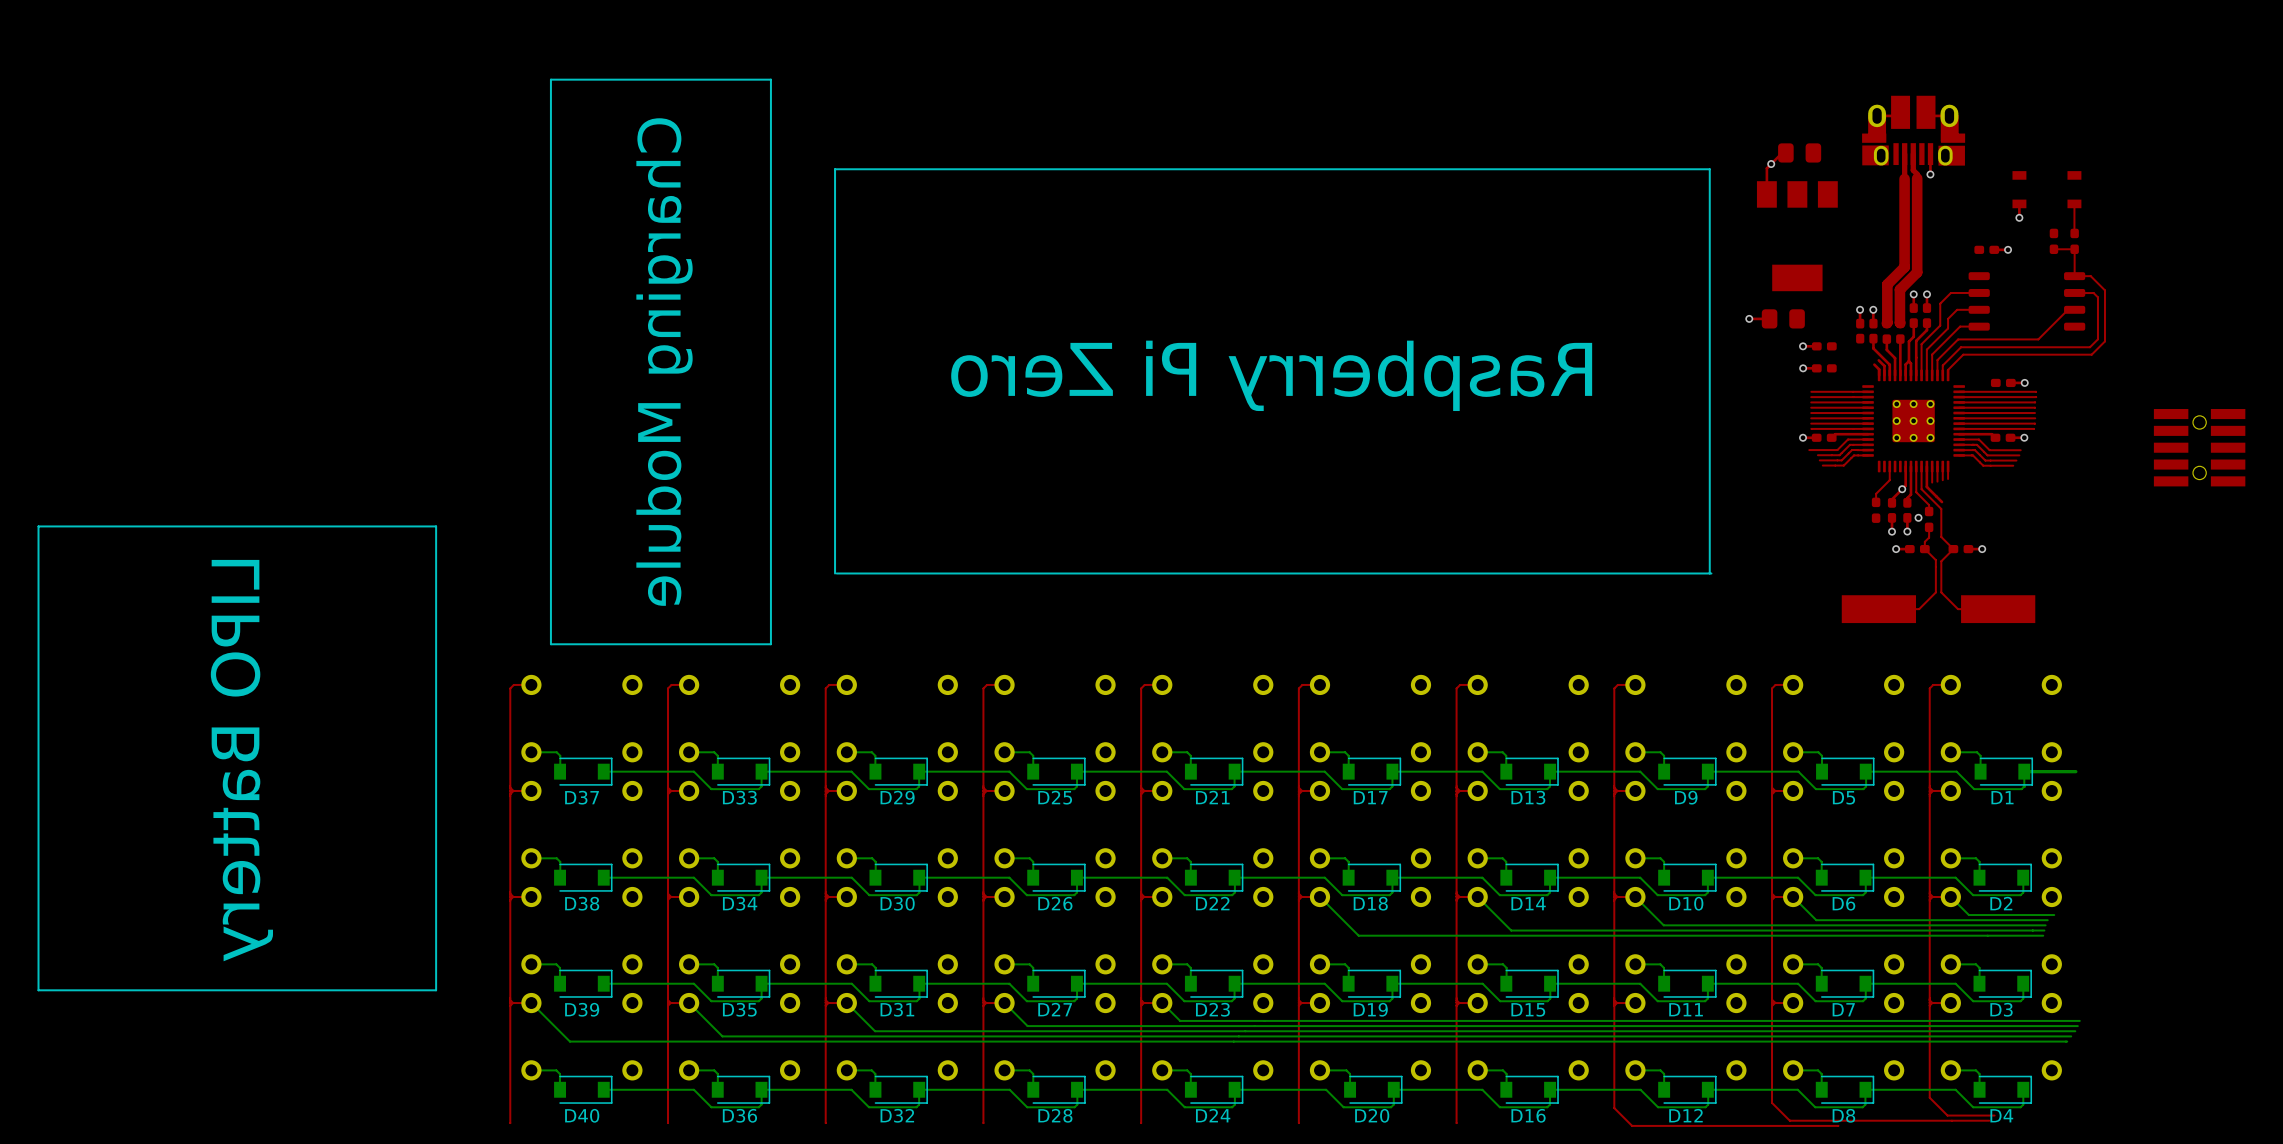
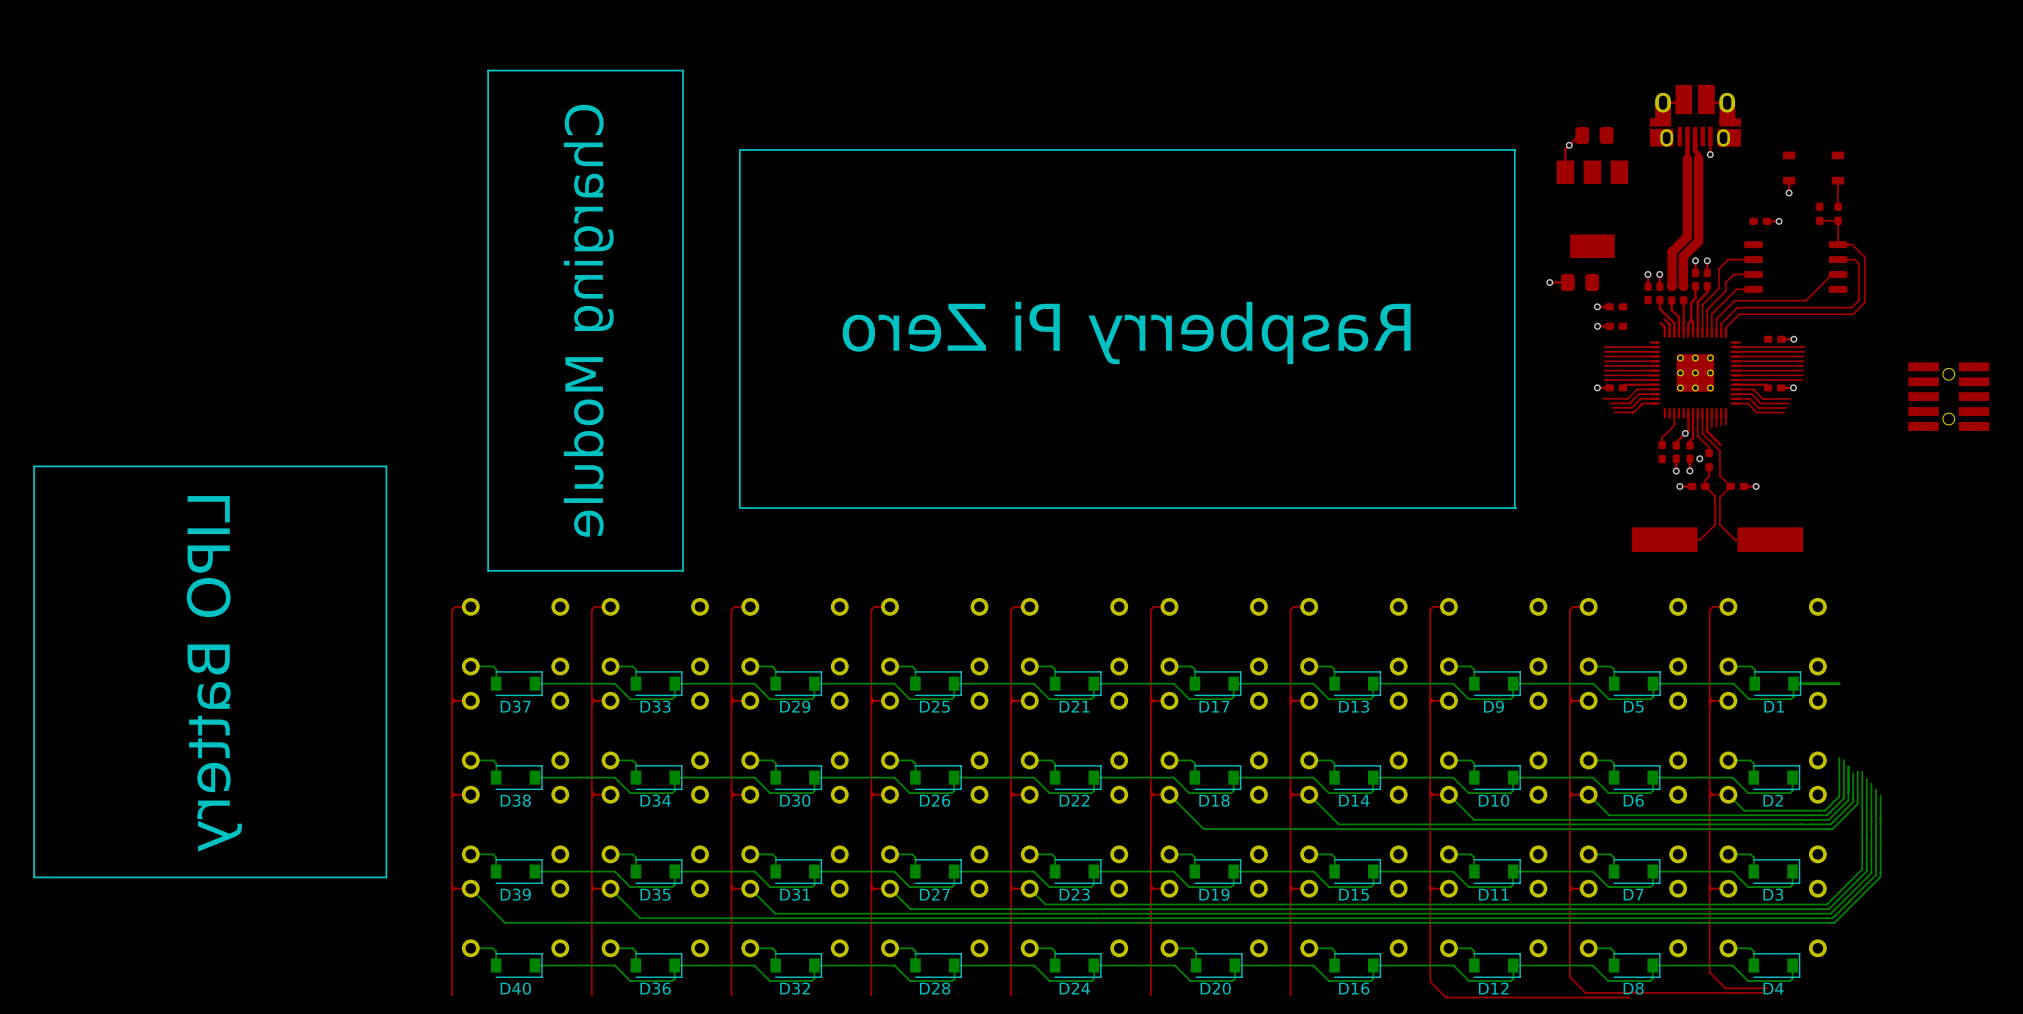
bottom track: none -> (1839, 758) (1839, 796) (1825, 810) (1819, 810)
bottom track: none -> (1843, 760) (1843, 798) (1826, 815) (1814, 815)
bottom track: none -> (1848, 766) (1848, 800) (1828, 819) (1812, 819)
bottom track: none -> (1857, 771) (1857, 803) (1832, 828) (1810, 829)
bottom track: none -> (1853, 773) (1853, 802) (1830, 824) (1811, 824)
bottom track: none -> (1880, 795) (1880, 876) (1834, 922) (1831, 922)
bottom track: (2079, 1020) (2062, 1020) -> (1862, 771) (1862, 869) (1827, 904)
bottom track: (2077, 1026) (2064, 1026) -> (1866, 779) (1866, 871) (1828, 909)
bottom track: (2075, 1031) (2066, 1031) -> (1871, 783) (1871, 873) (1830, 913)
bottom track: (2071, 1036) (2068, 1036) -> (1875, 789) (1875, 874) (1832, 918)

